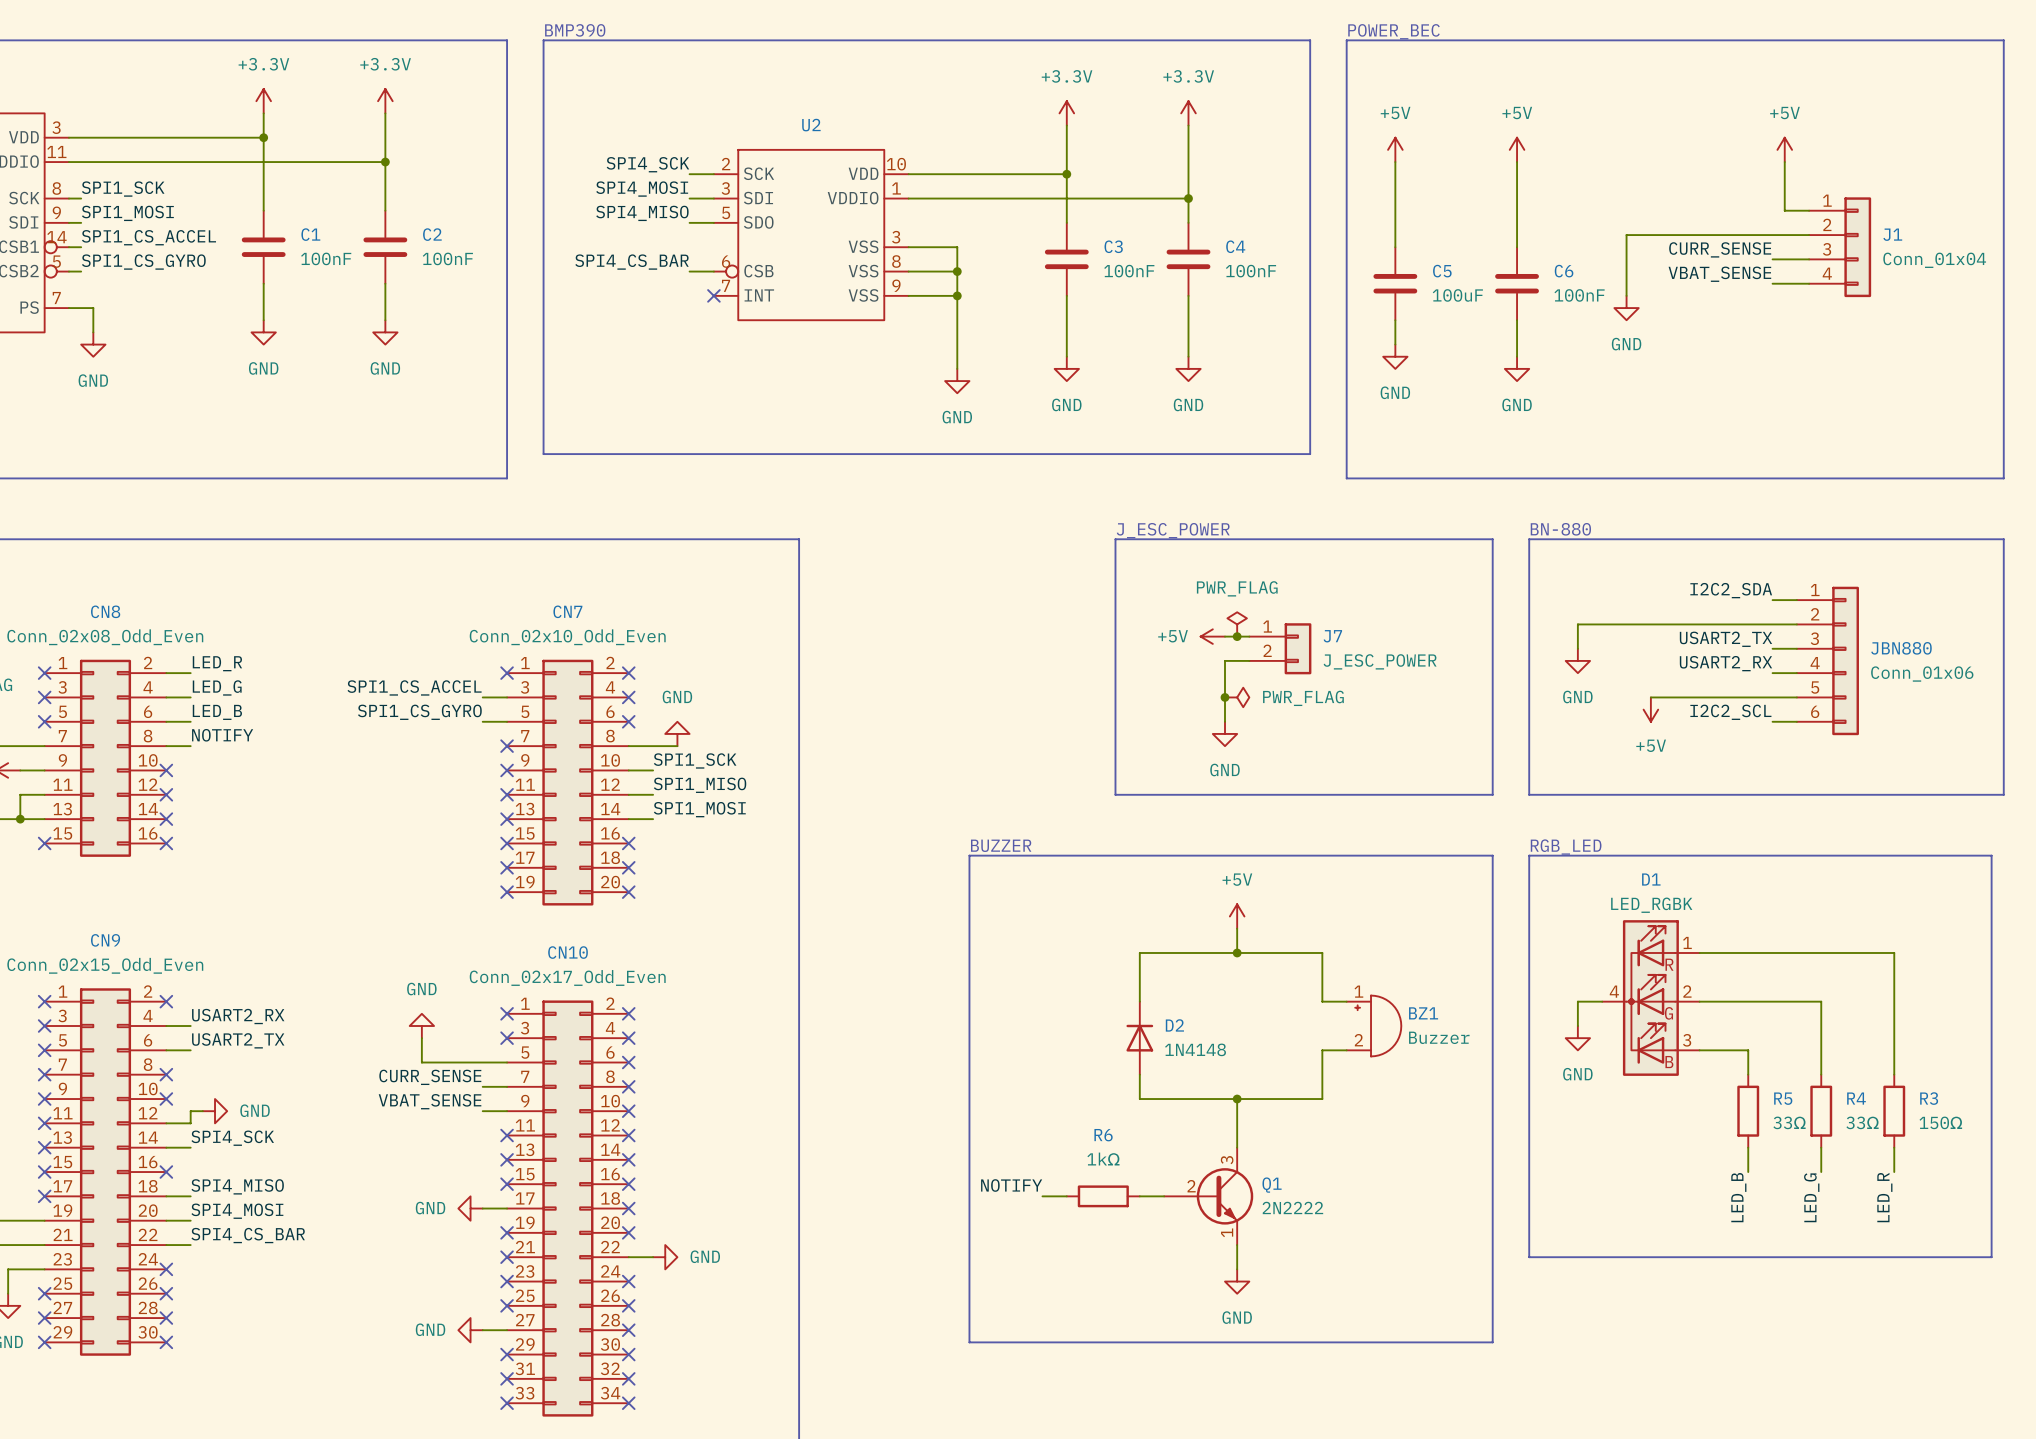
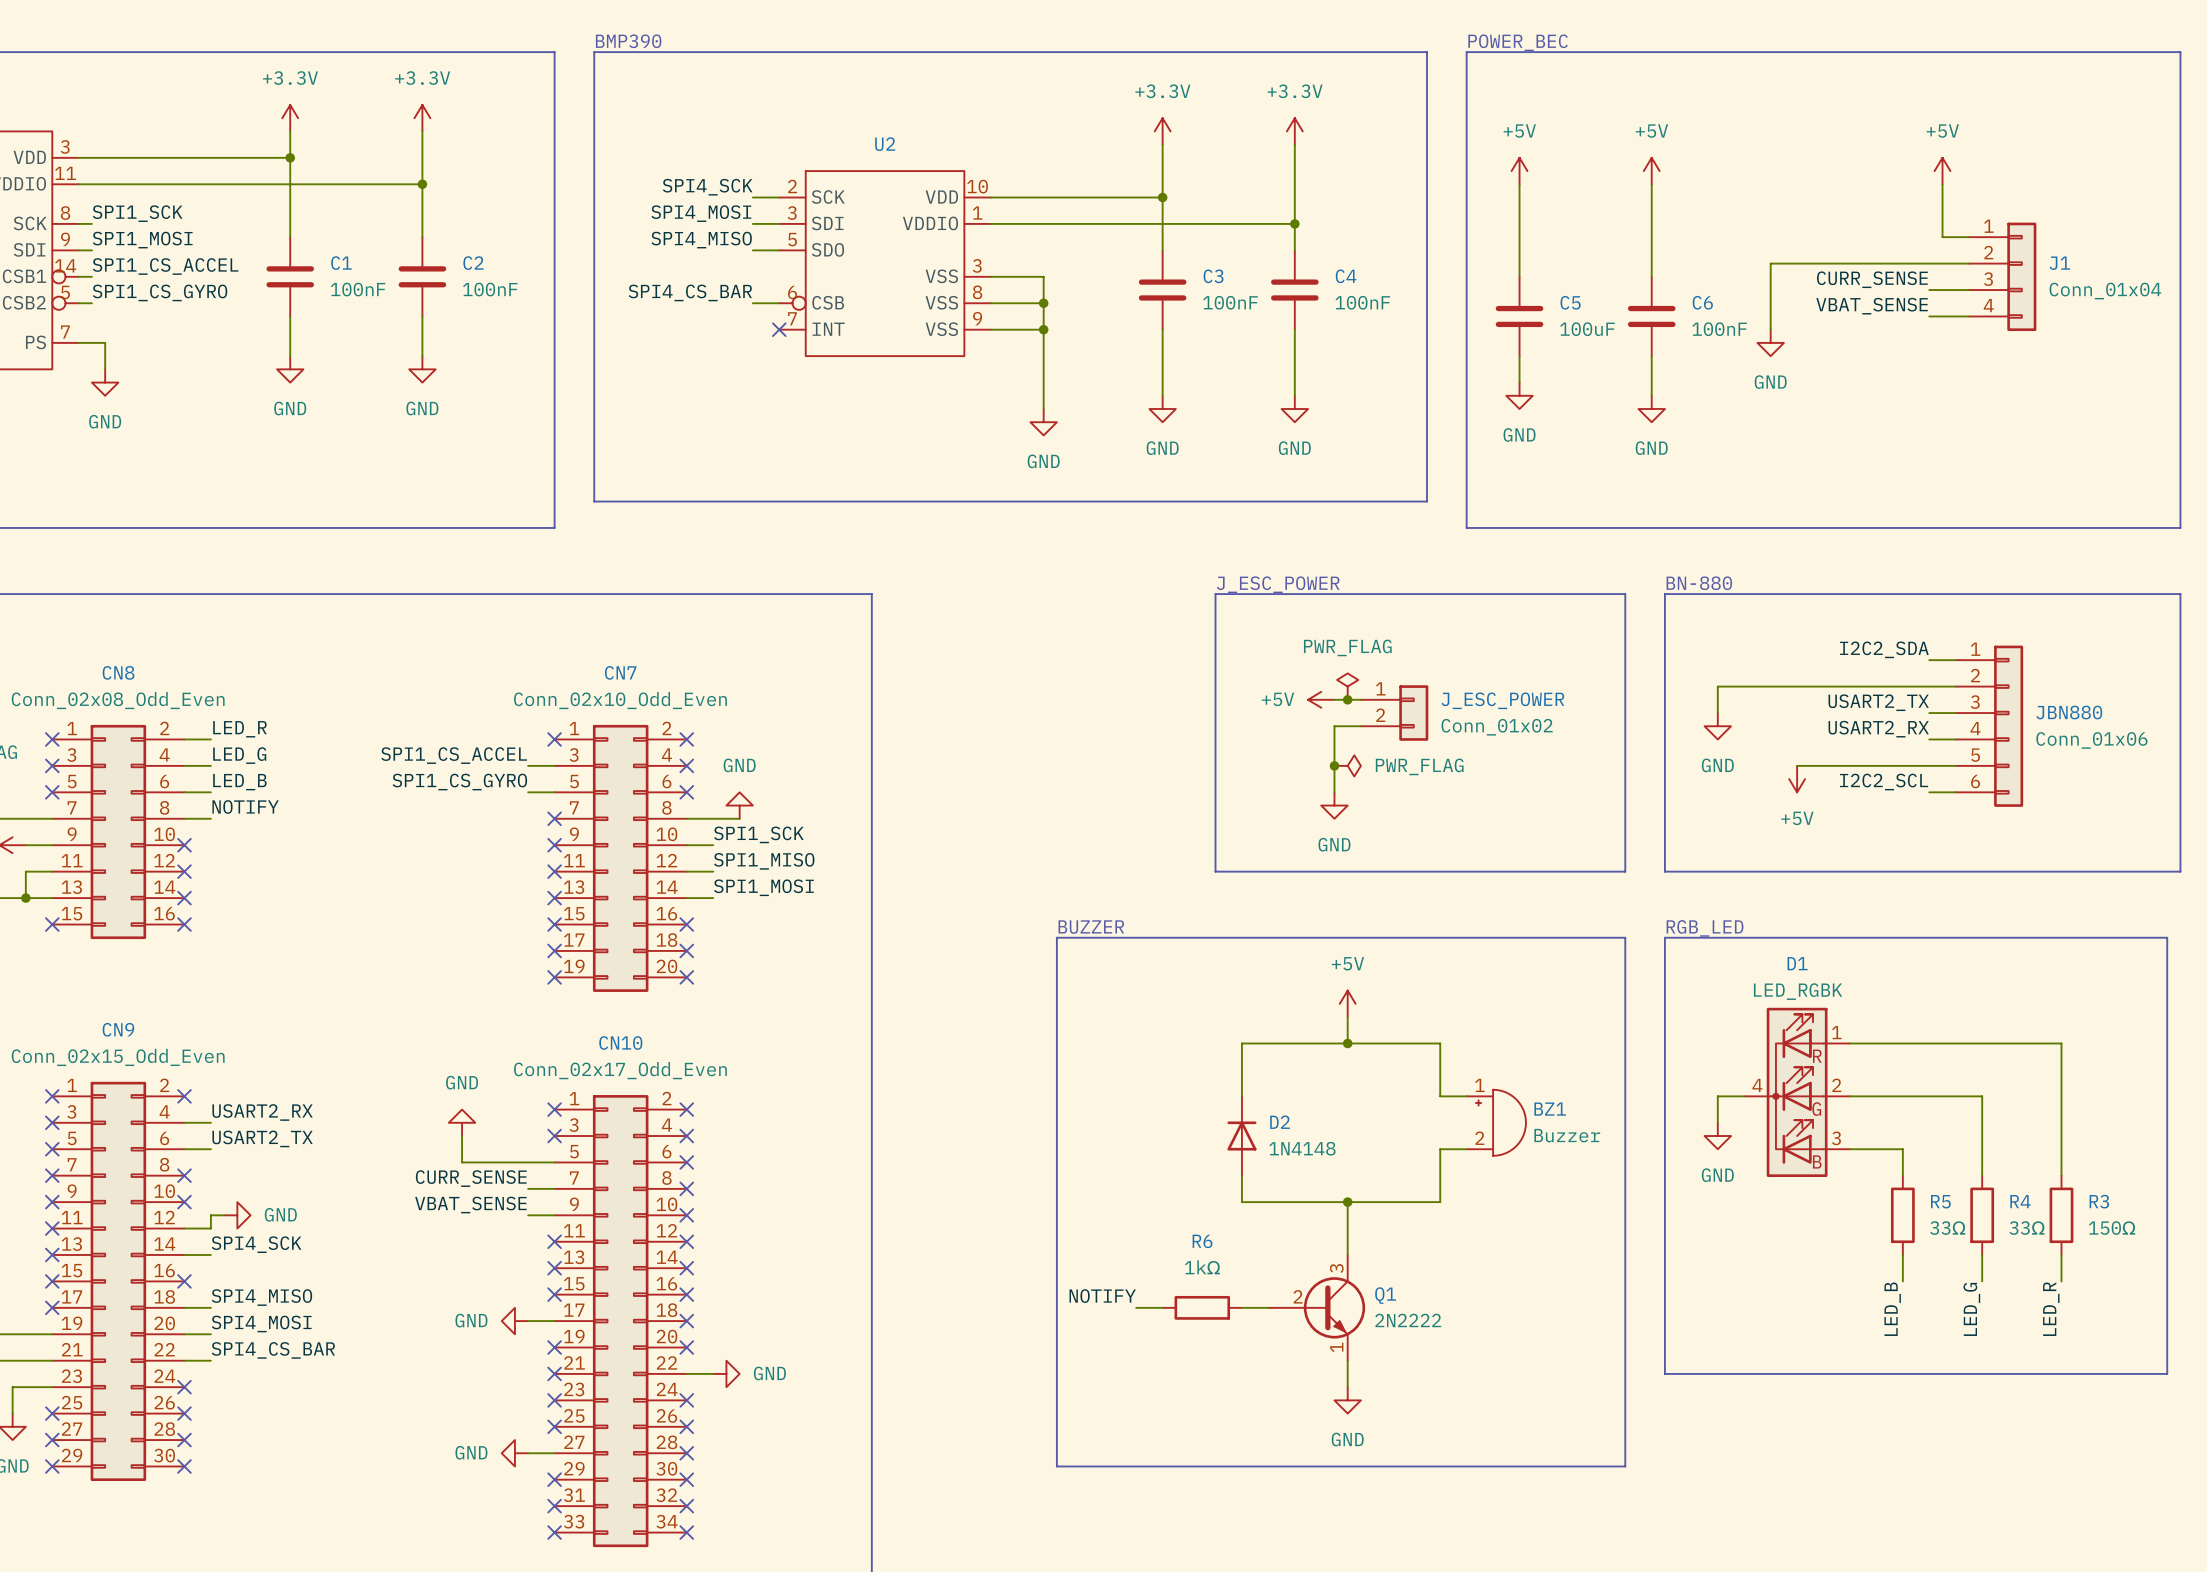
J7 name: J7 (1332, 636) -> J_ESC_POWER (1502, 700)
J7 value: J_ESC_POWER (1380, 661) -> Conn_01x02 (1497, 727)

